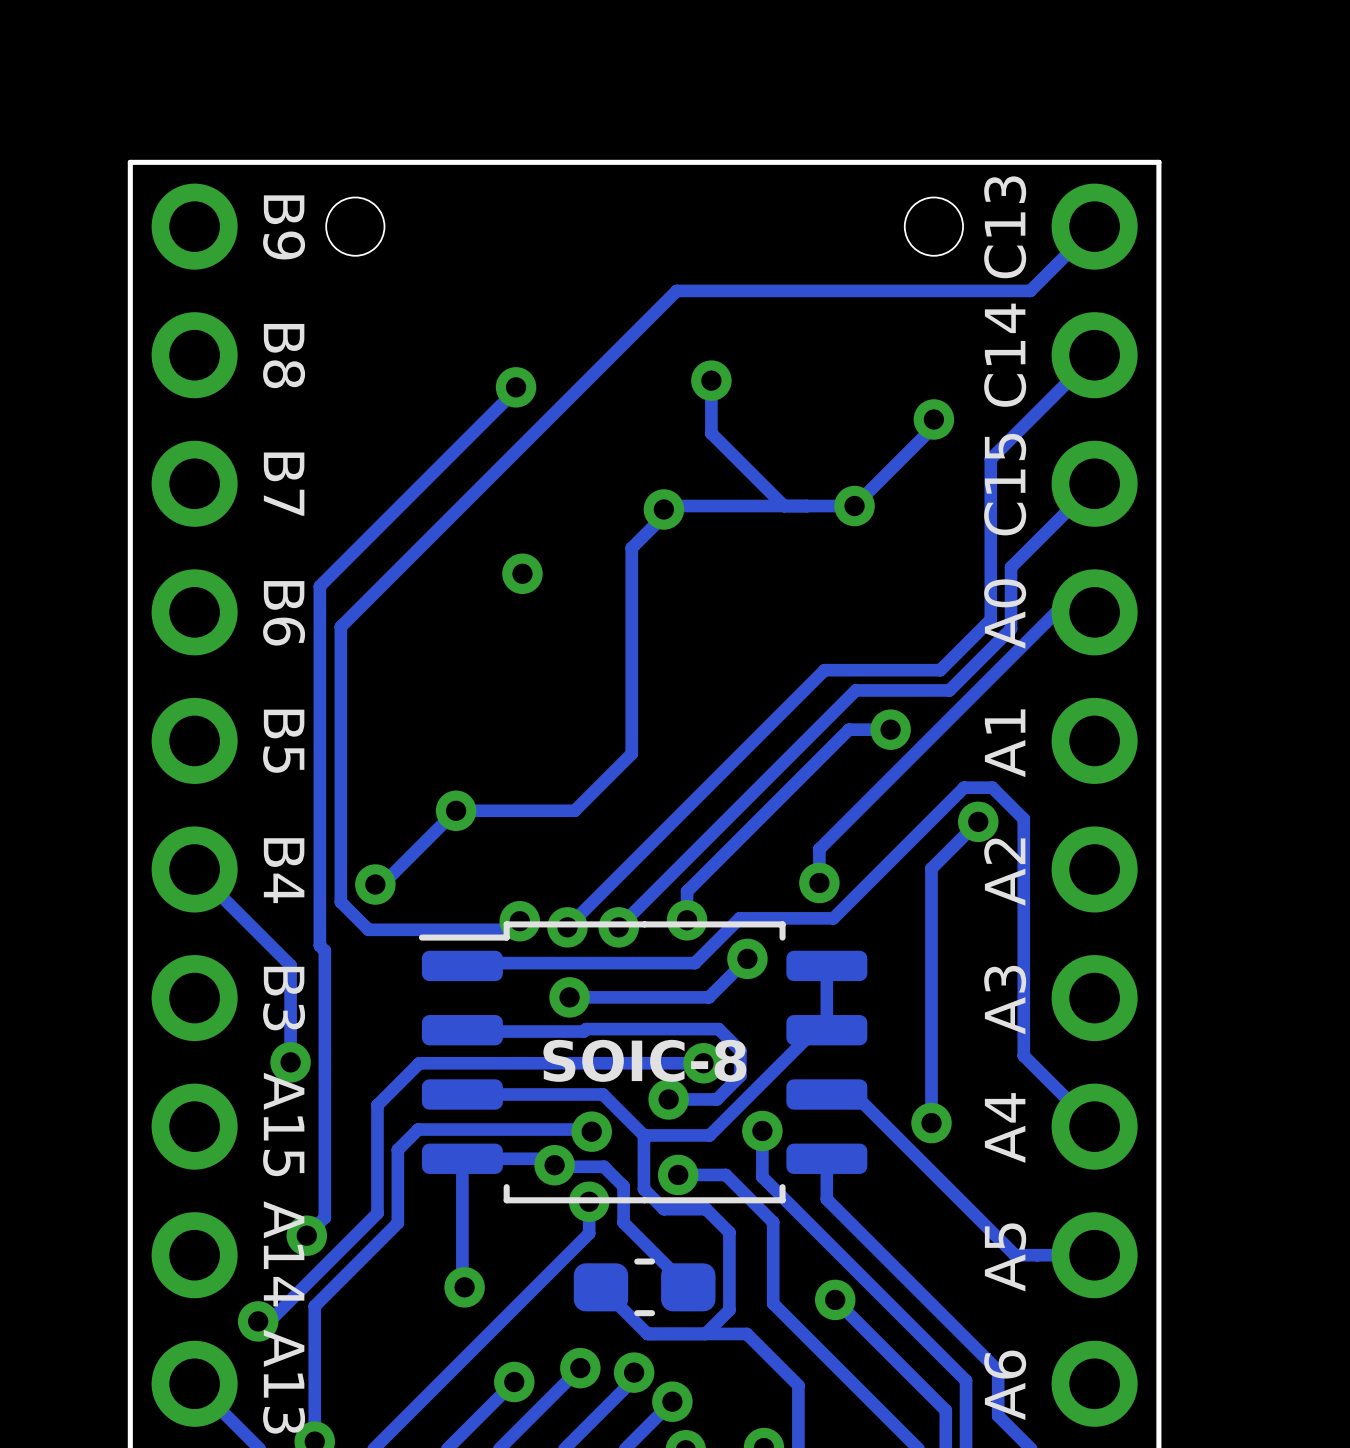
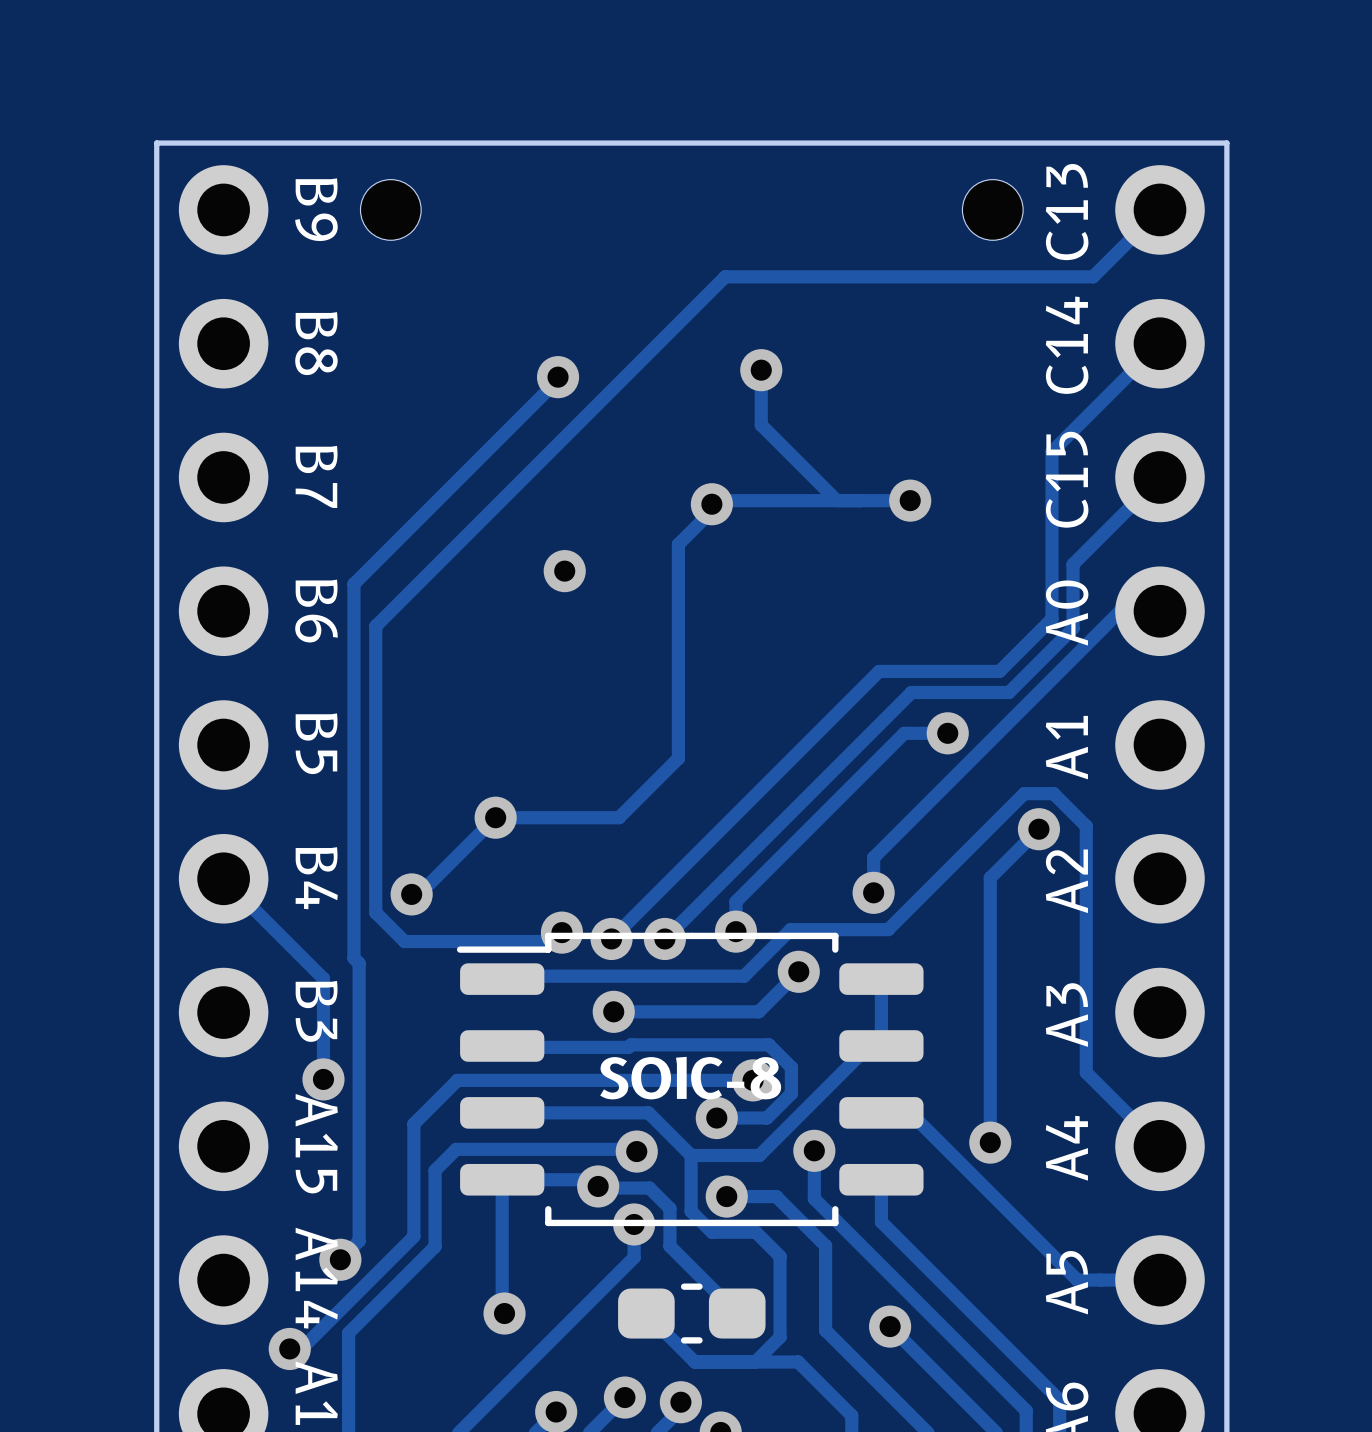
track: (933, 419) (933, 426) (854, 506) -> none
via: (933, 419) -> none

